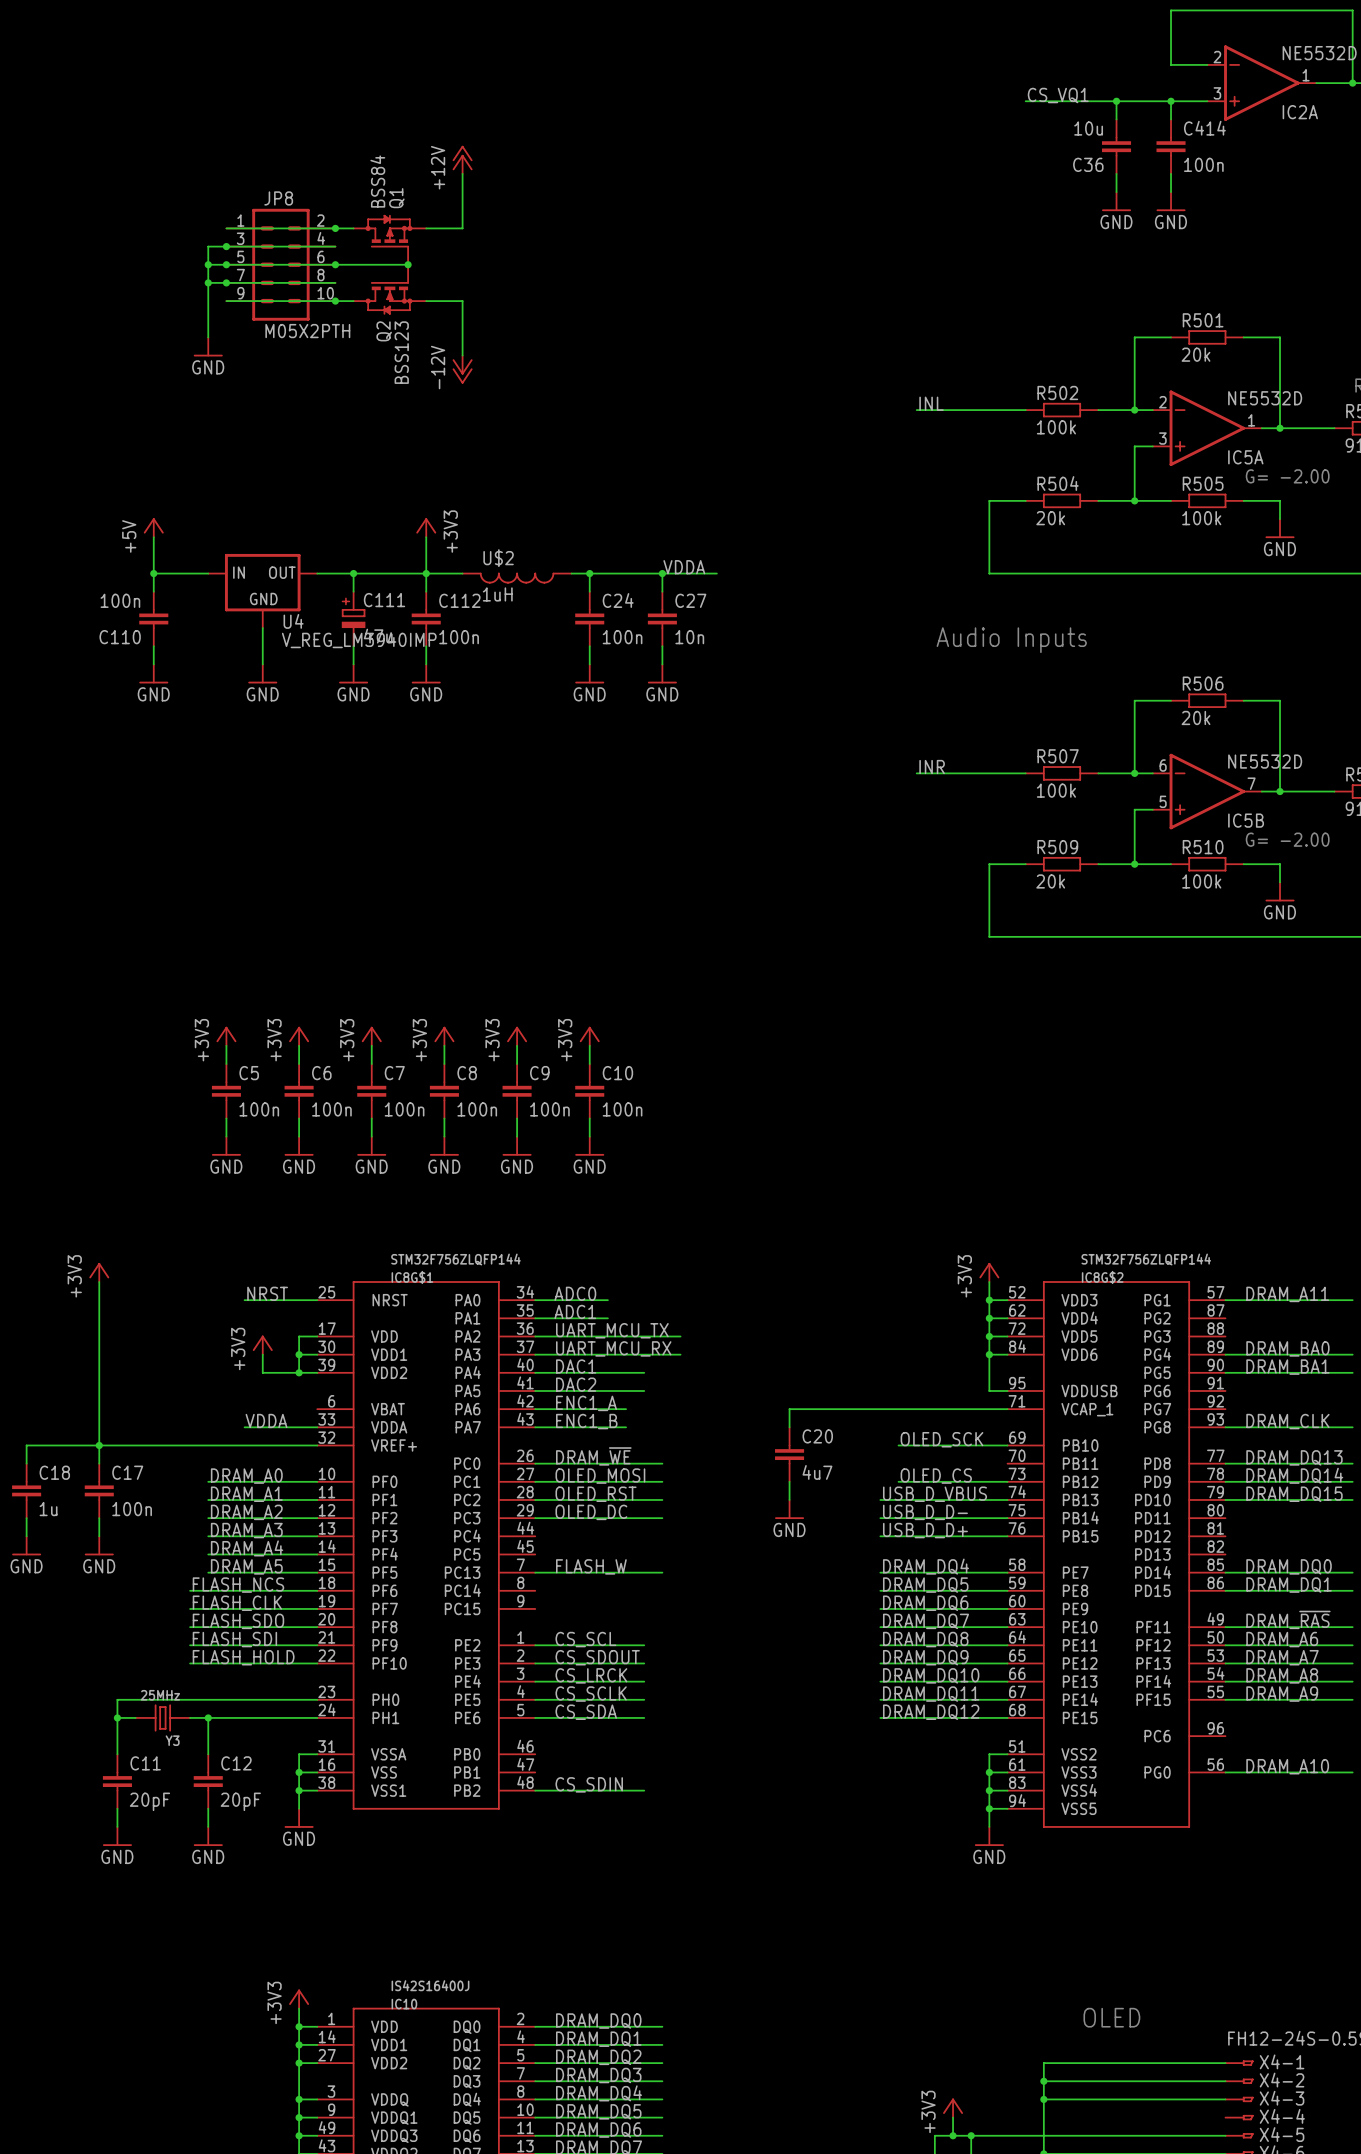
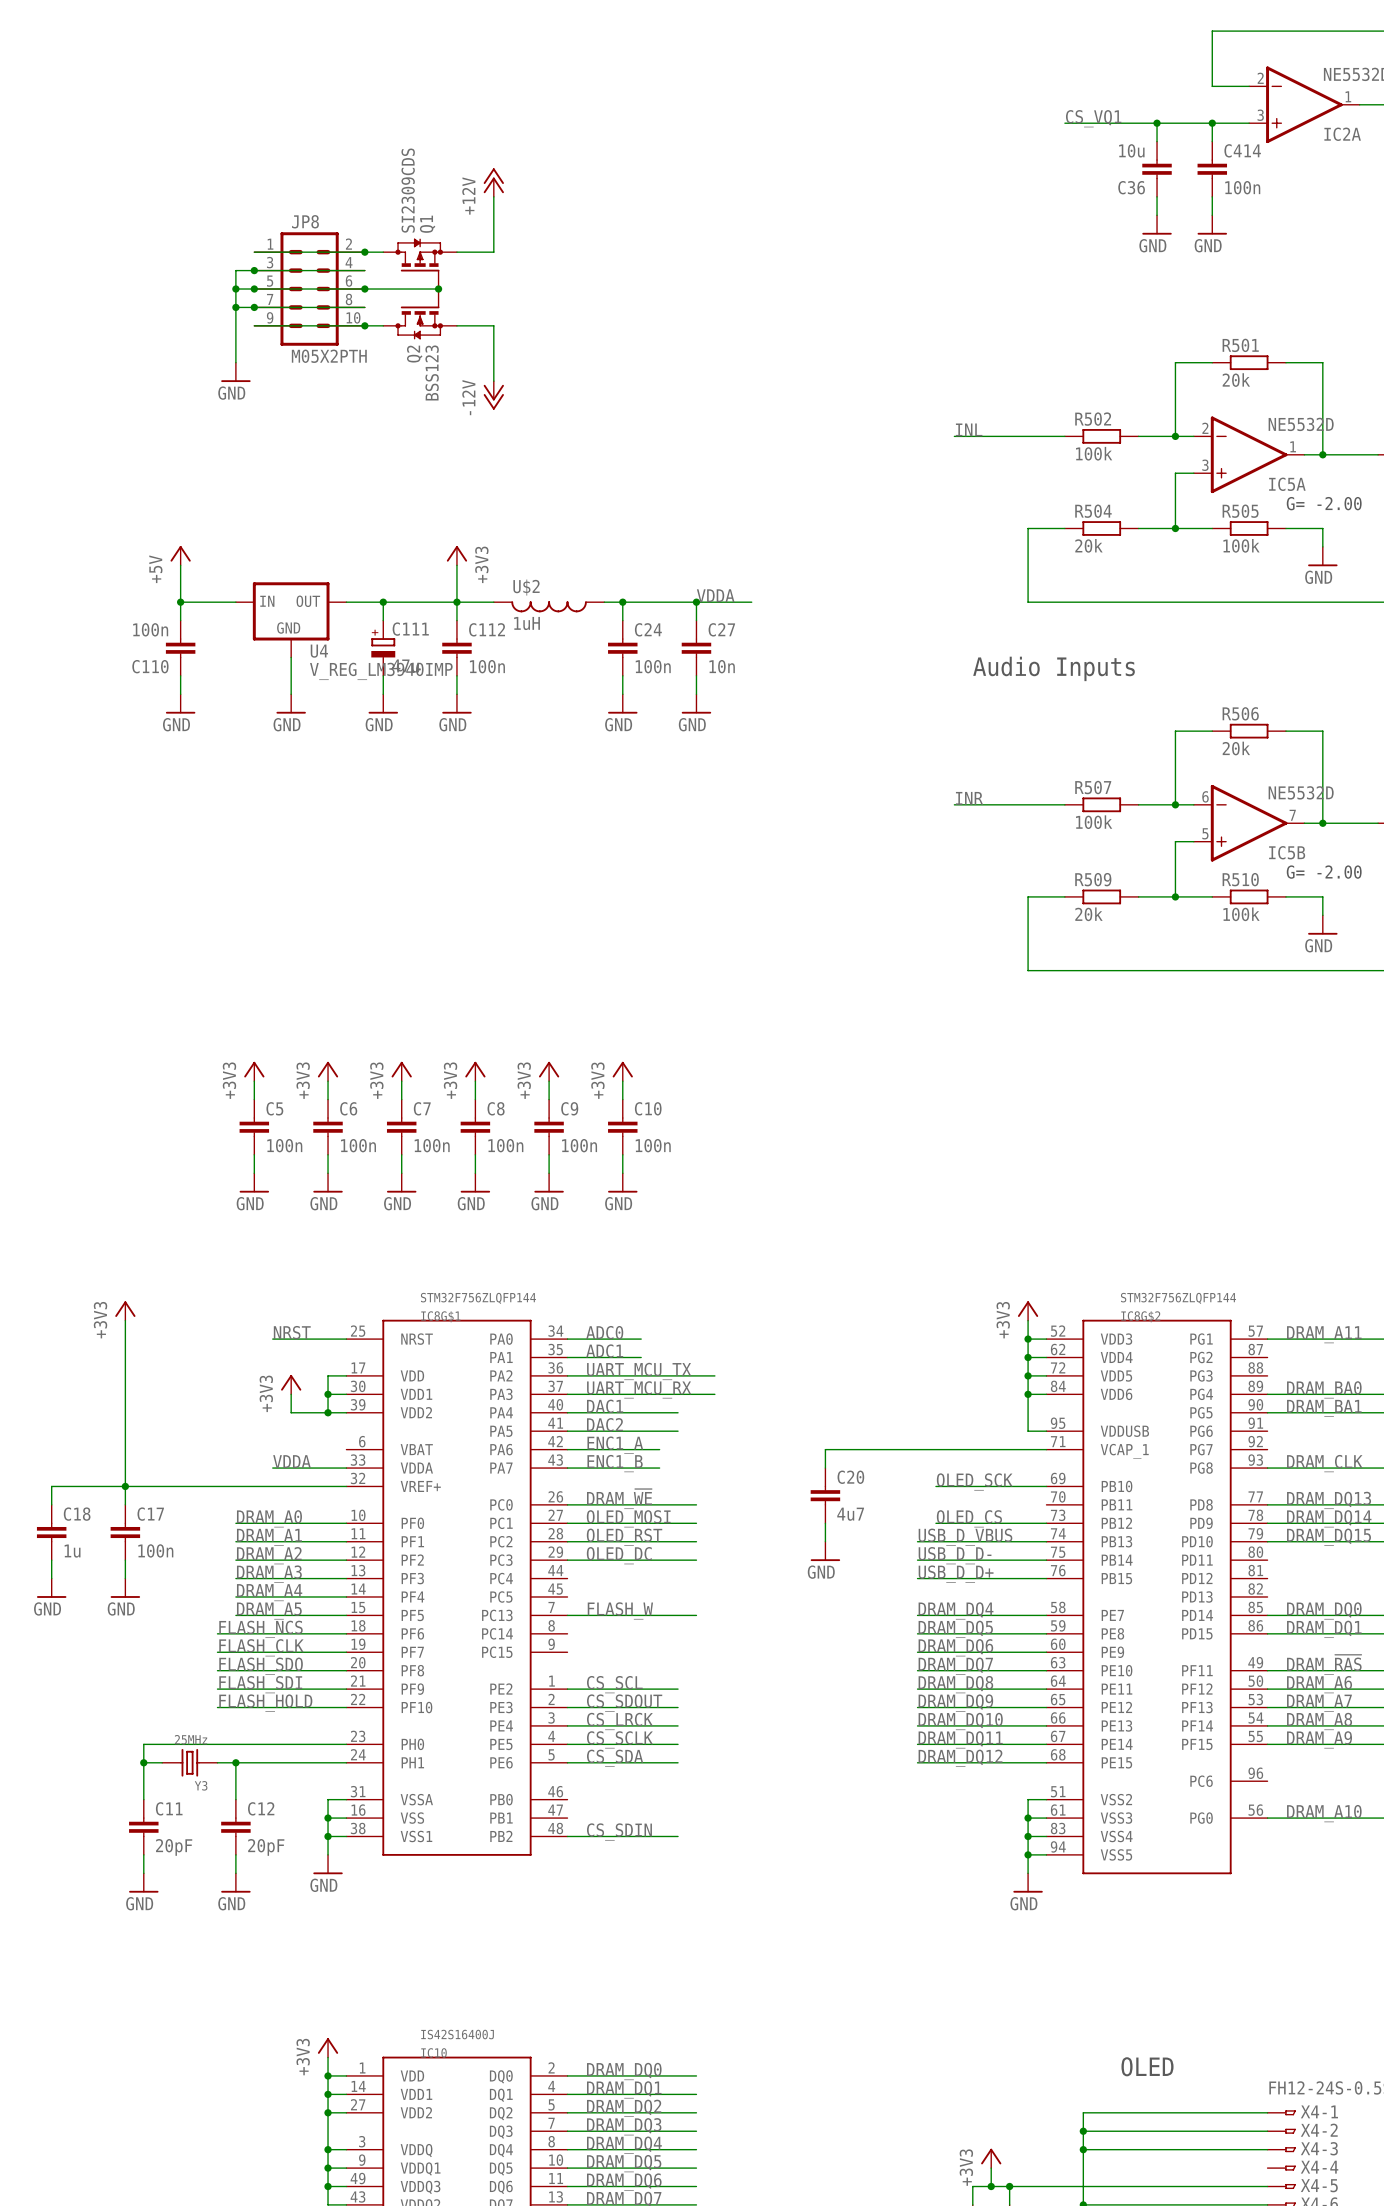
Q1 value: BSS84 (377, 181) -> SI2309CDS (408, 190)

